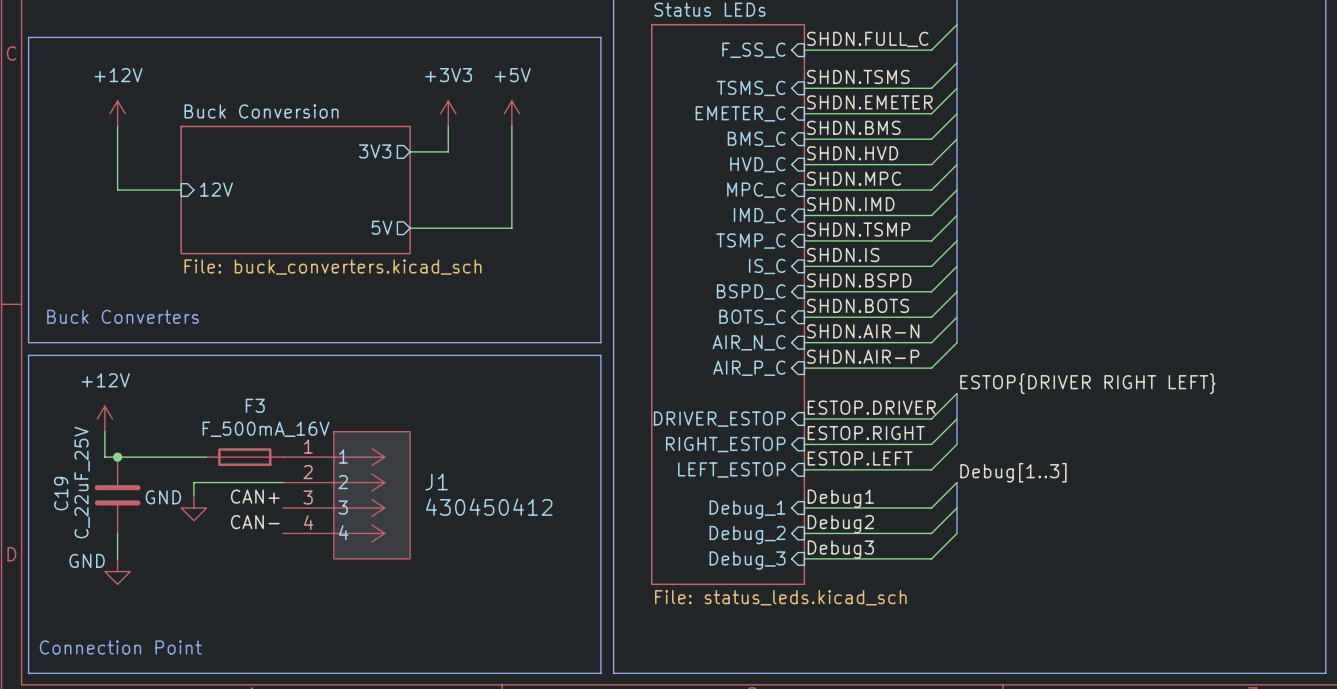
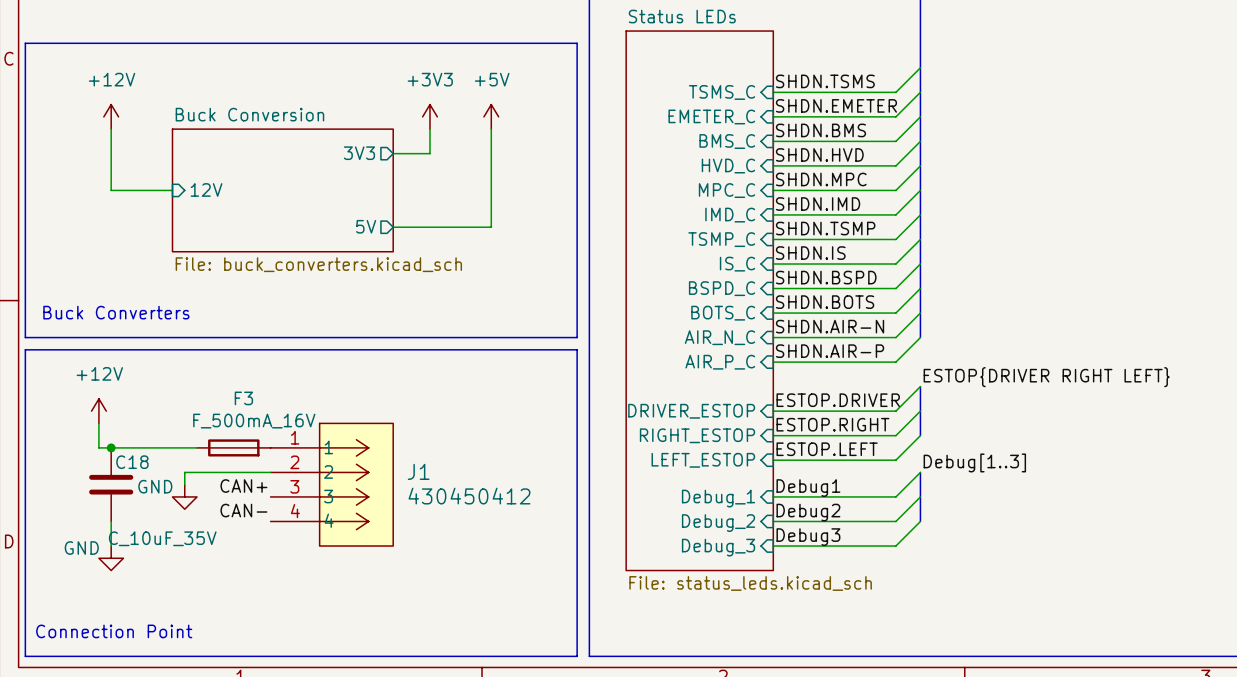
wire: (957, 24) (931, 50) (804, 50) -> none
label: SHDN.FULL_C (867, 39) -> none
sheet pin: F_SS_C (753, 50) -> none
C19 value: C_22uF_25V (82, 482) -> C_10uF_35V (162, 538)
C19 name: C19 (61, 493) -> C18 (132, 462)

